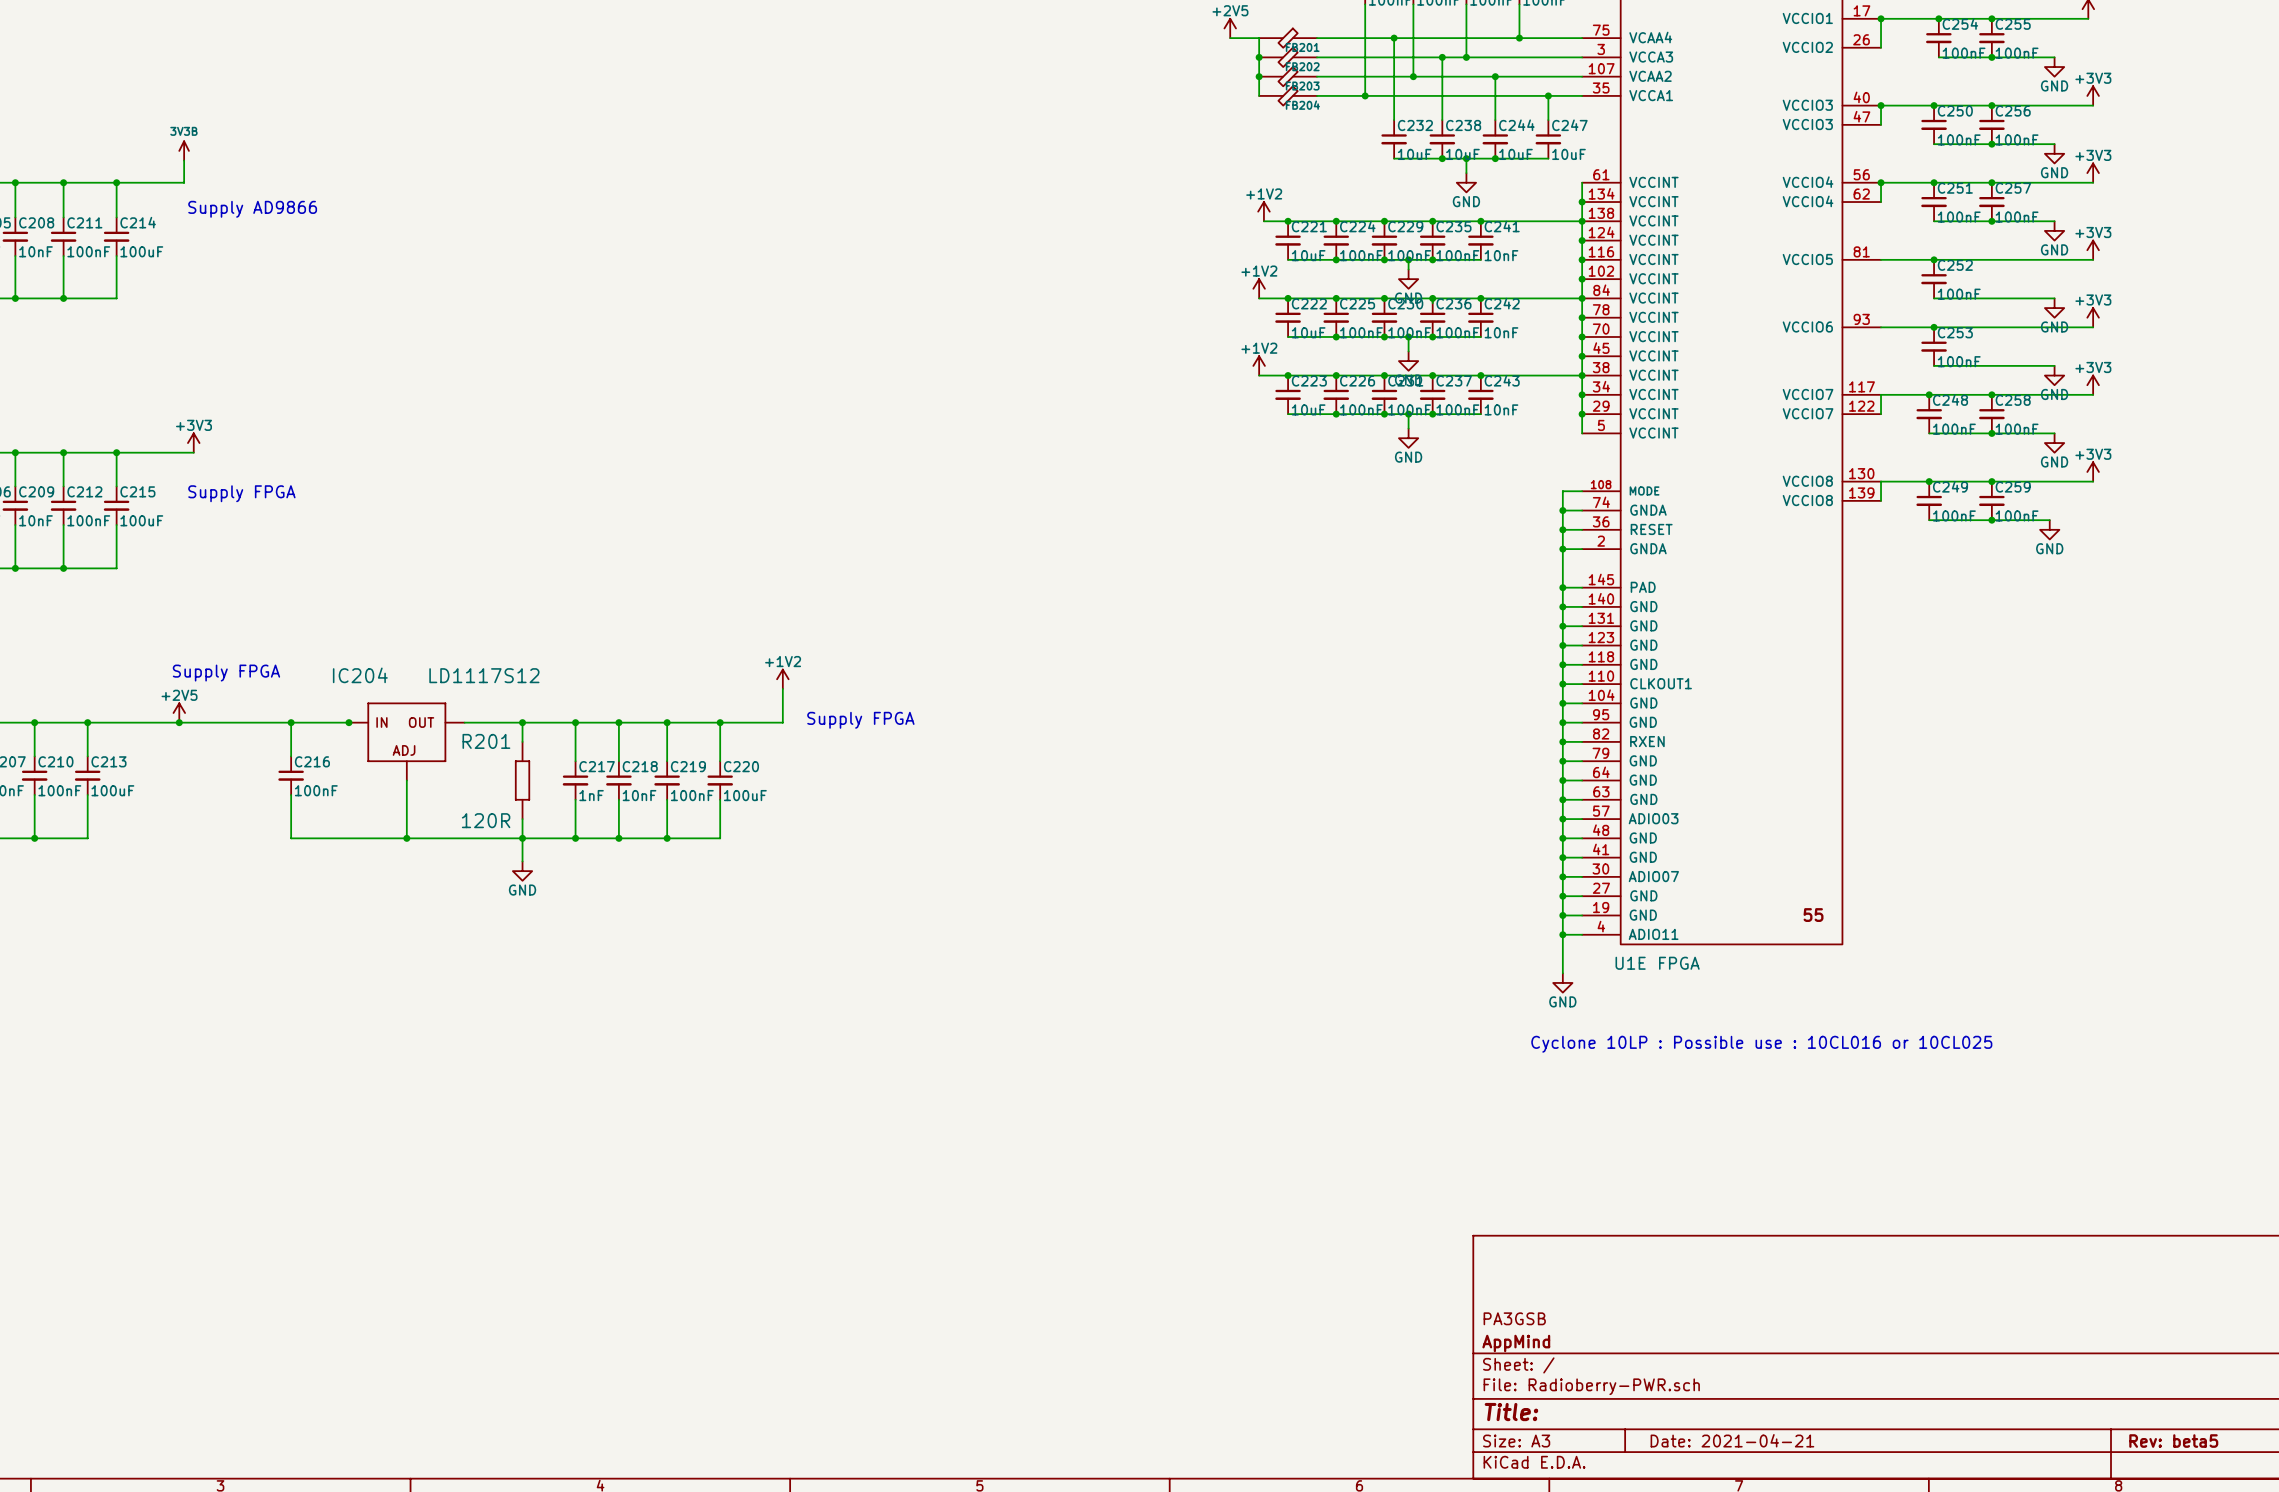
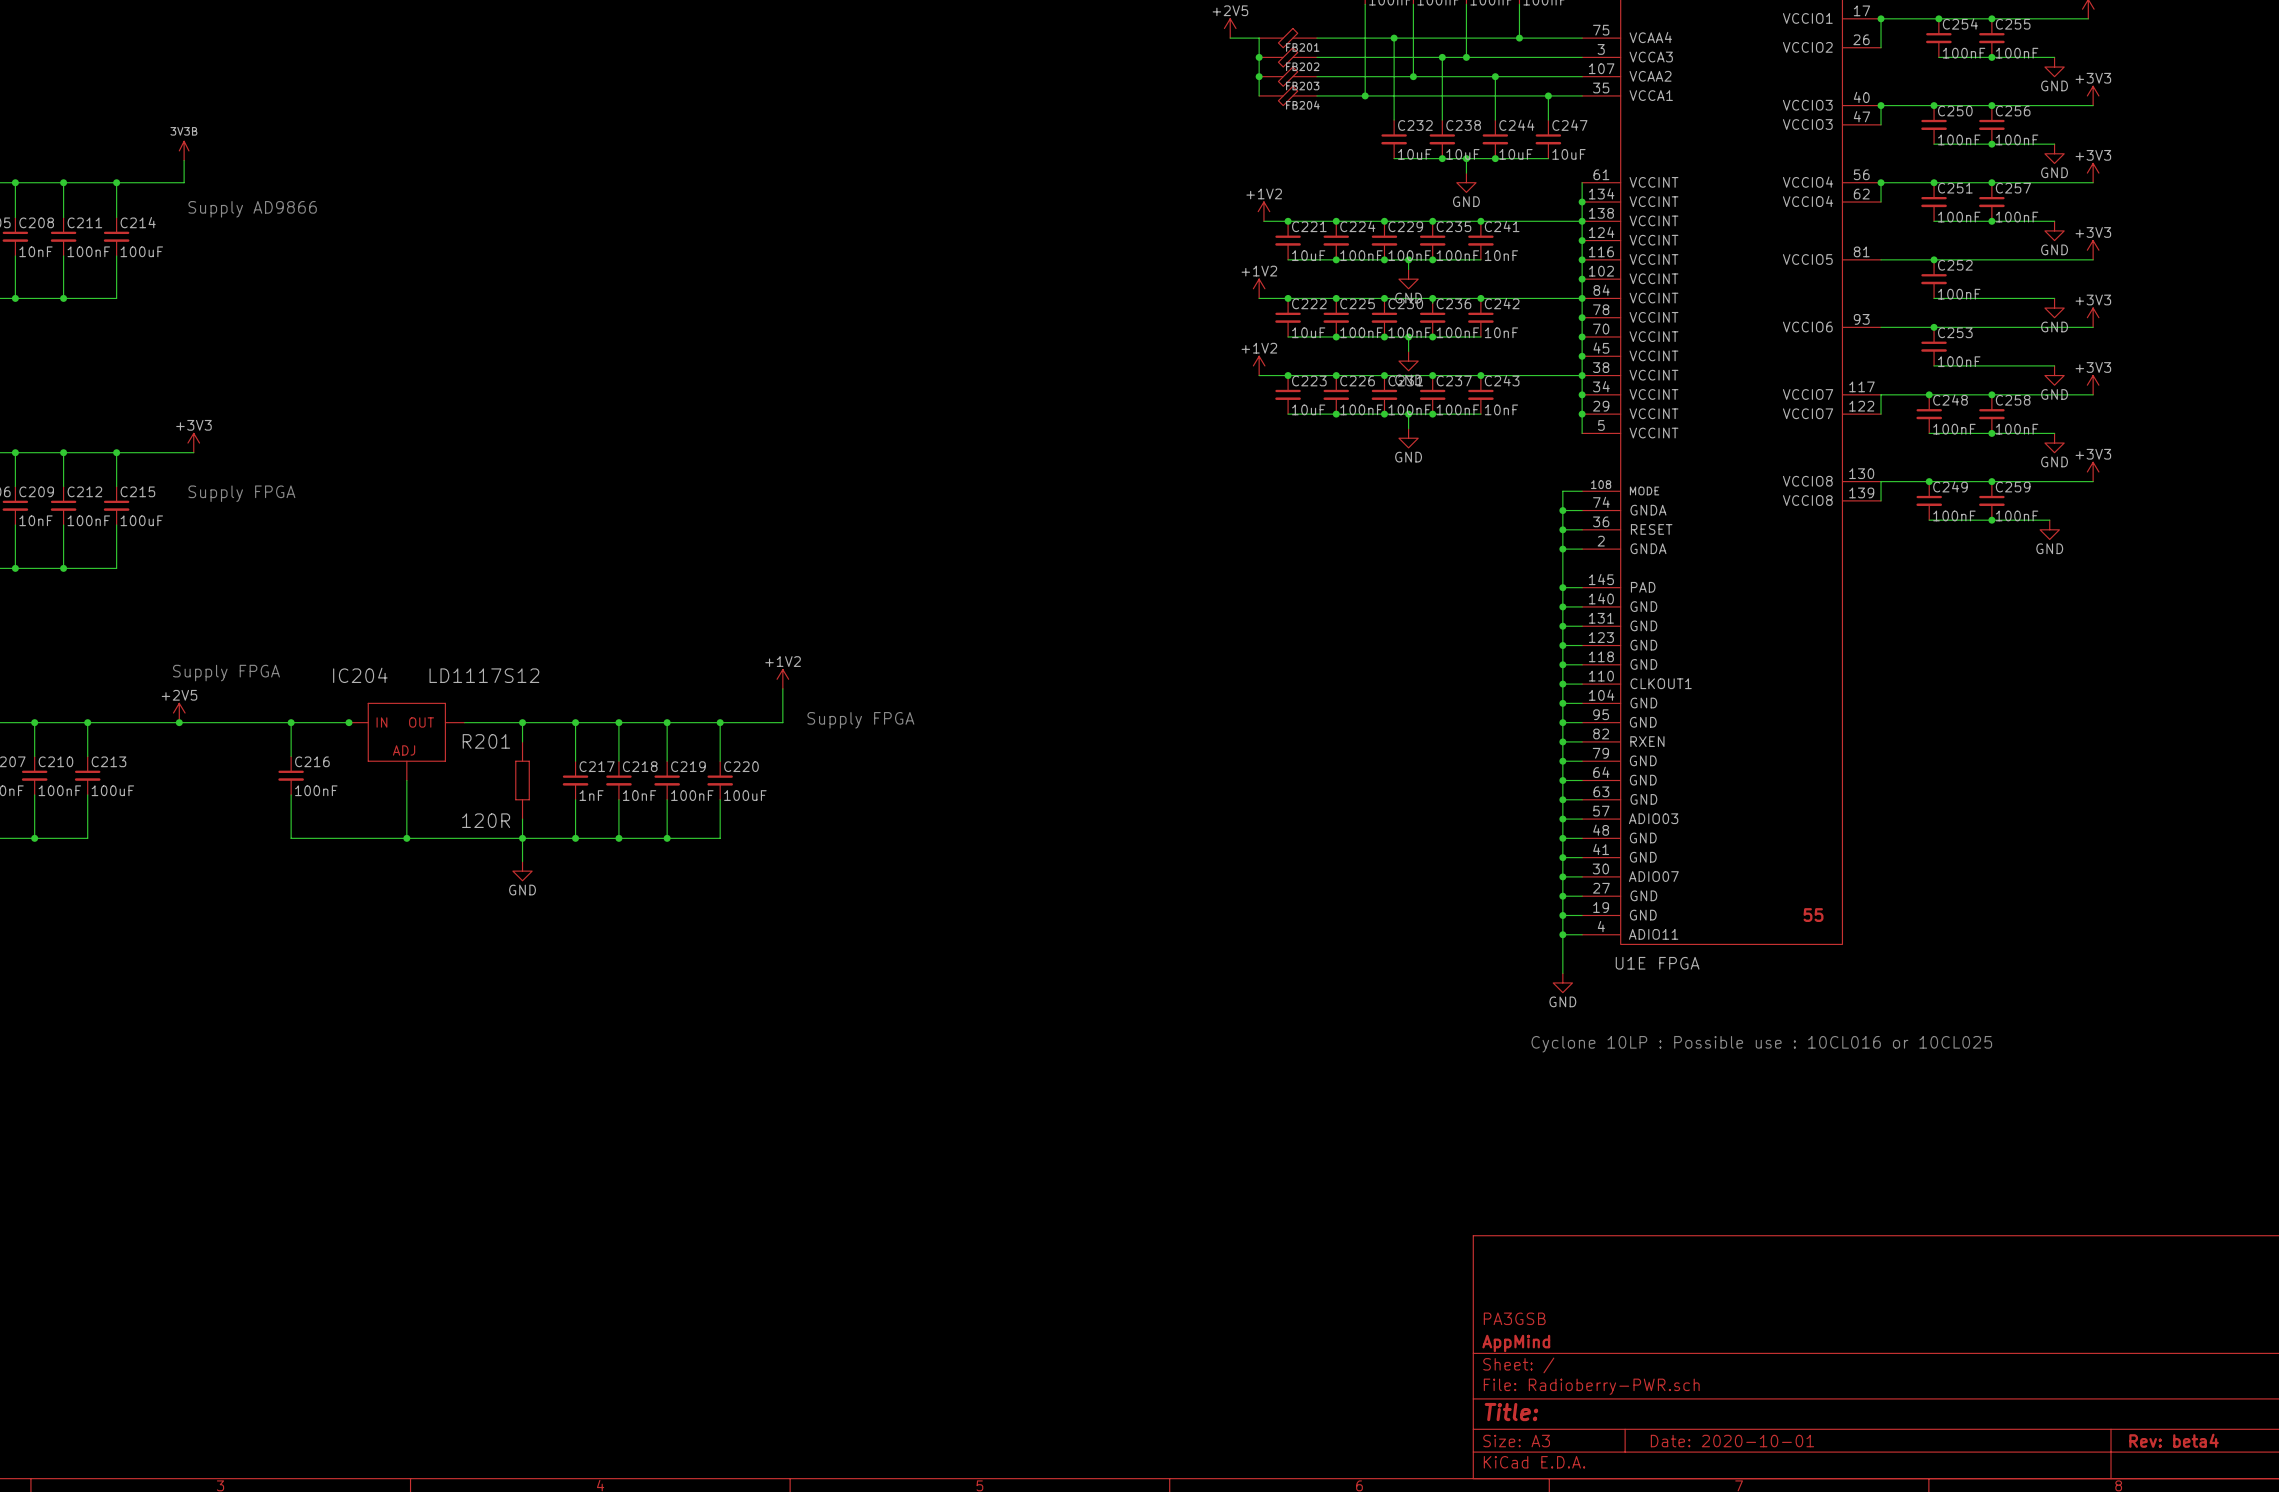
title block: Date: 2021-04-21 (1732, 1440) -> Date: 2020-10-01 (1732, 1441)
title block: Rev: beta5 (2173, 1441) -> Rev: beta4 (2174, 1440)

